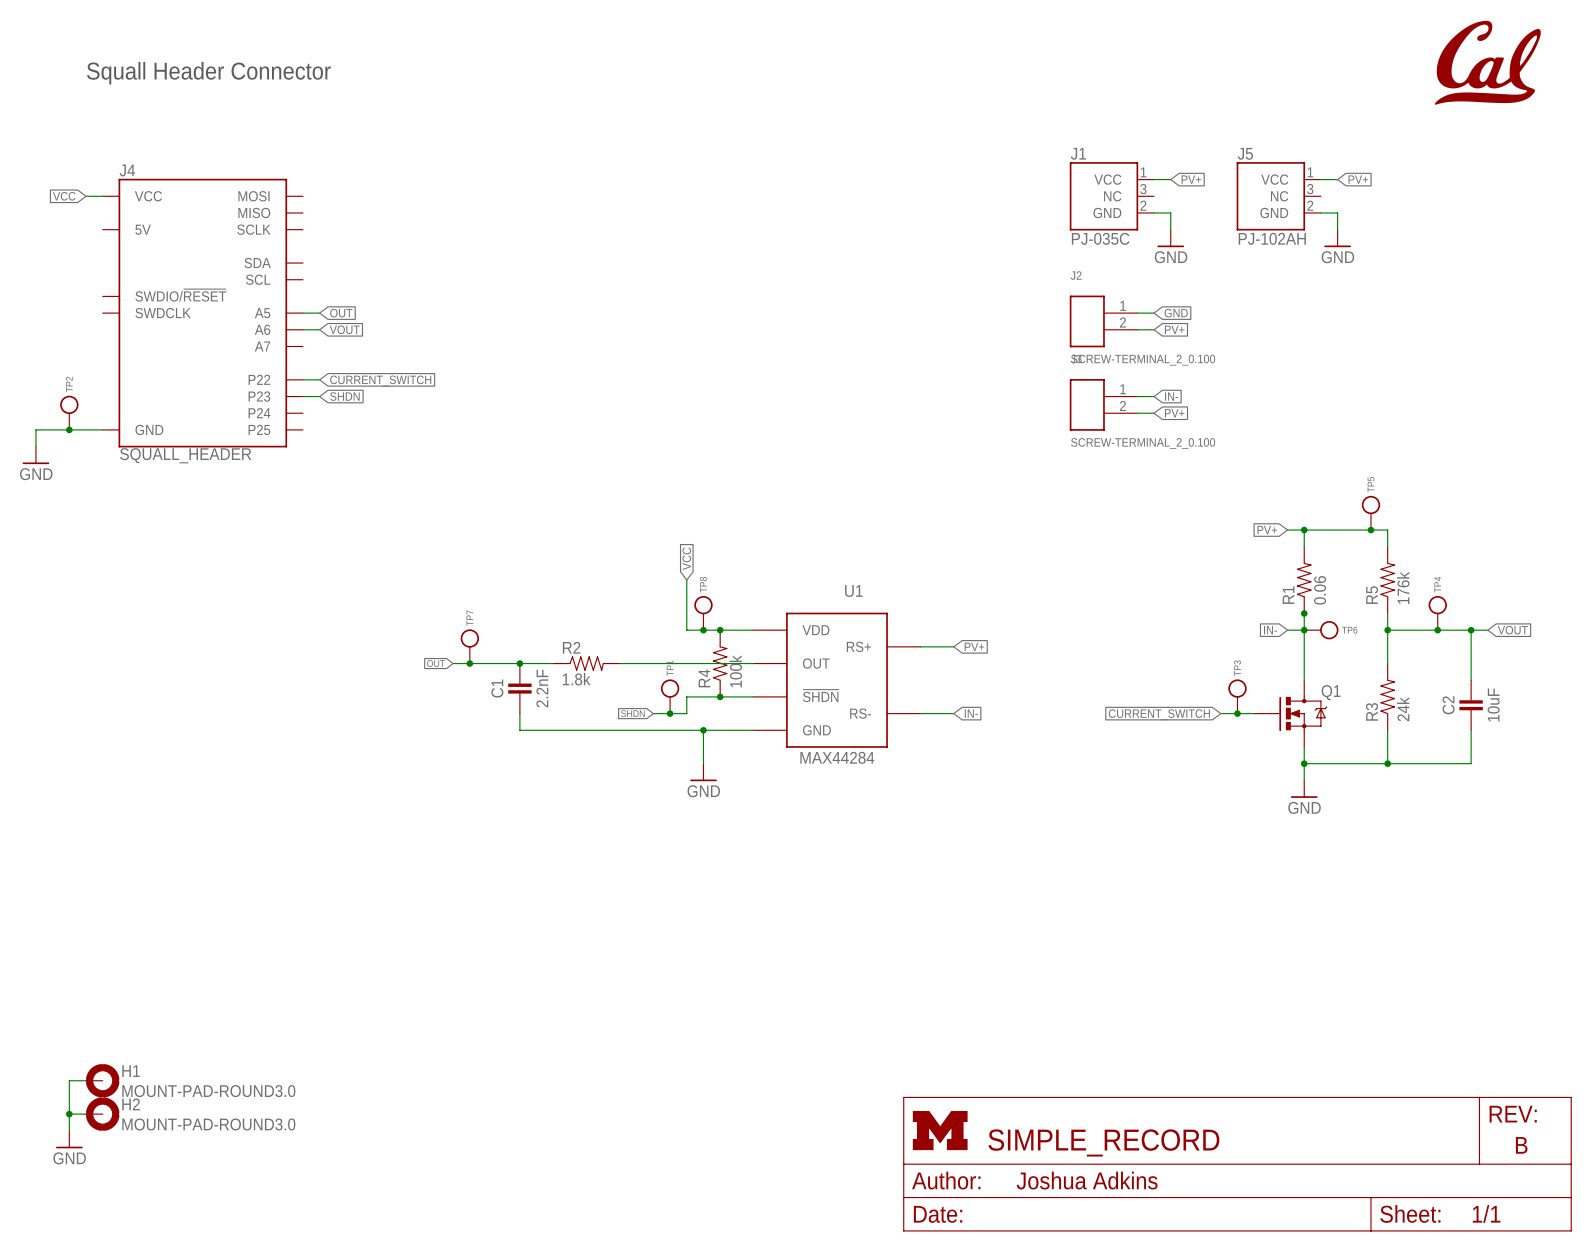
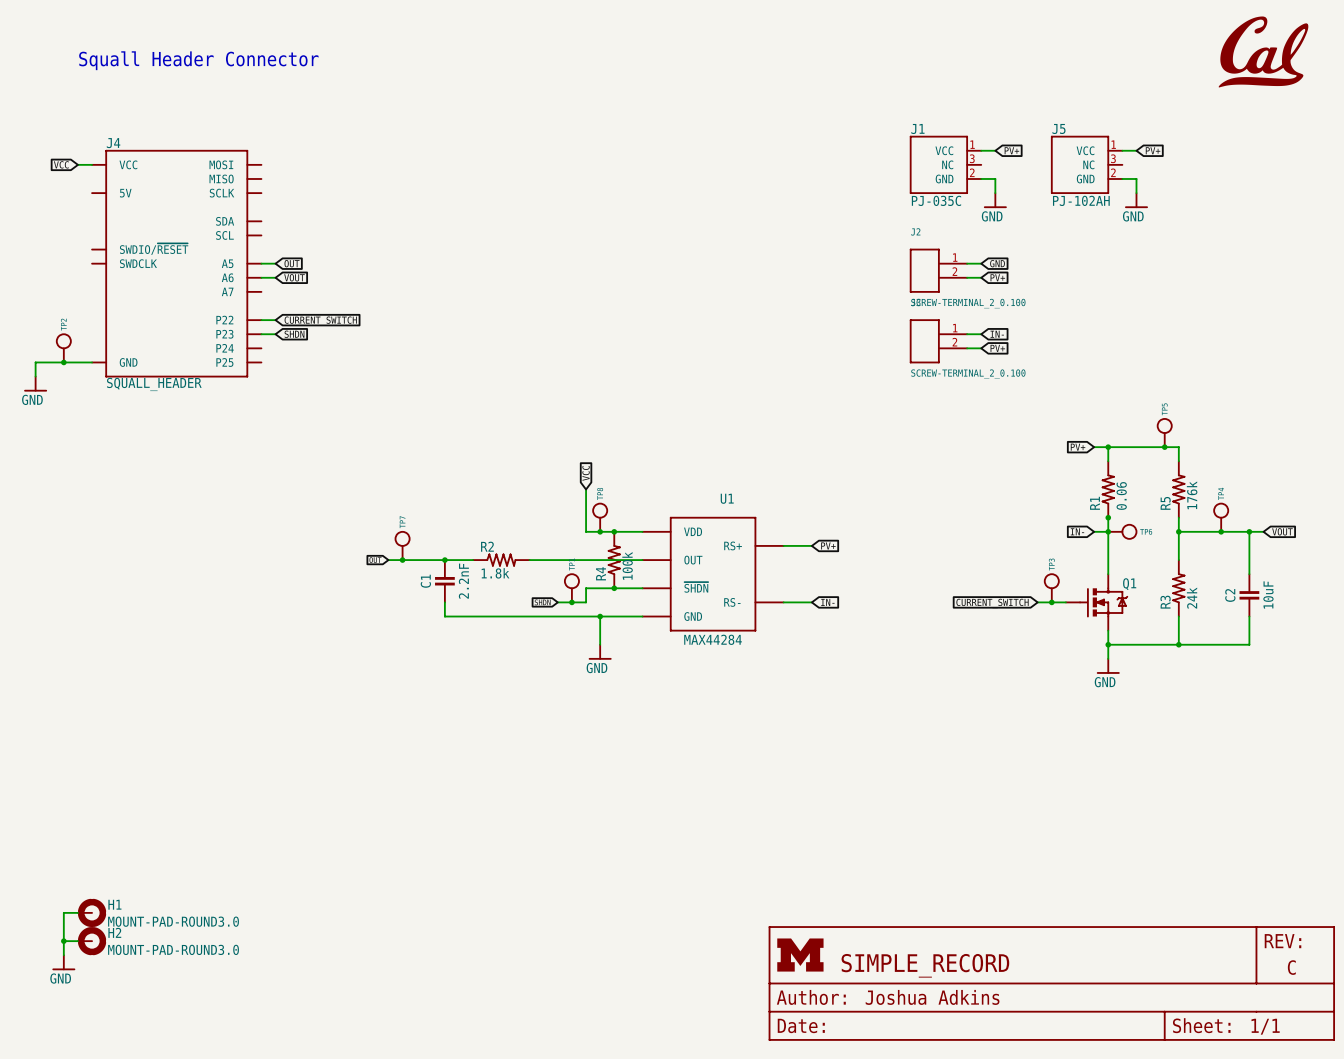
part text: B (1521, 1145) -> C (1291, 967)

